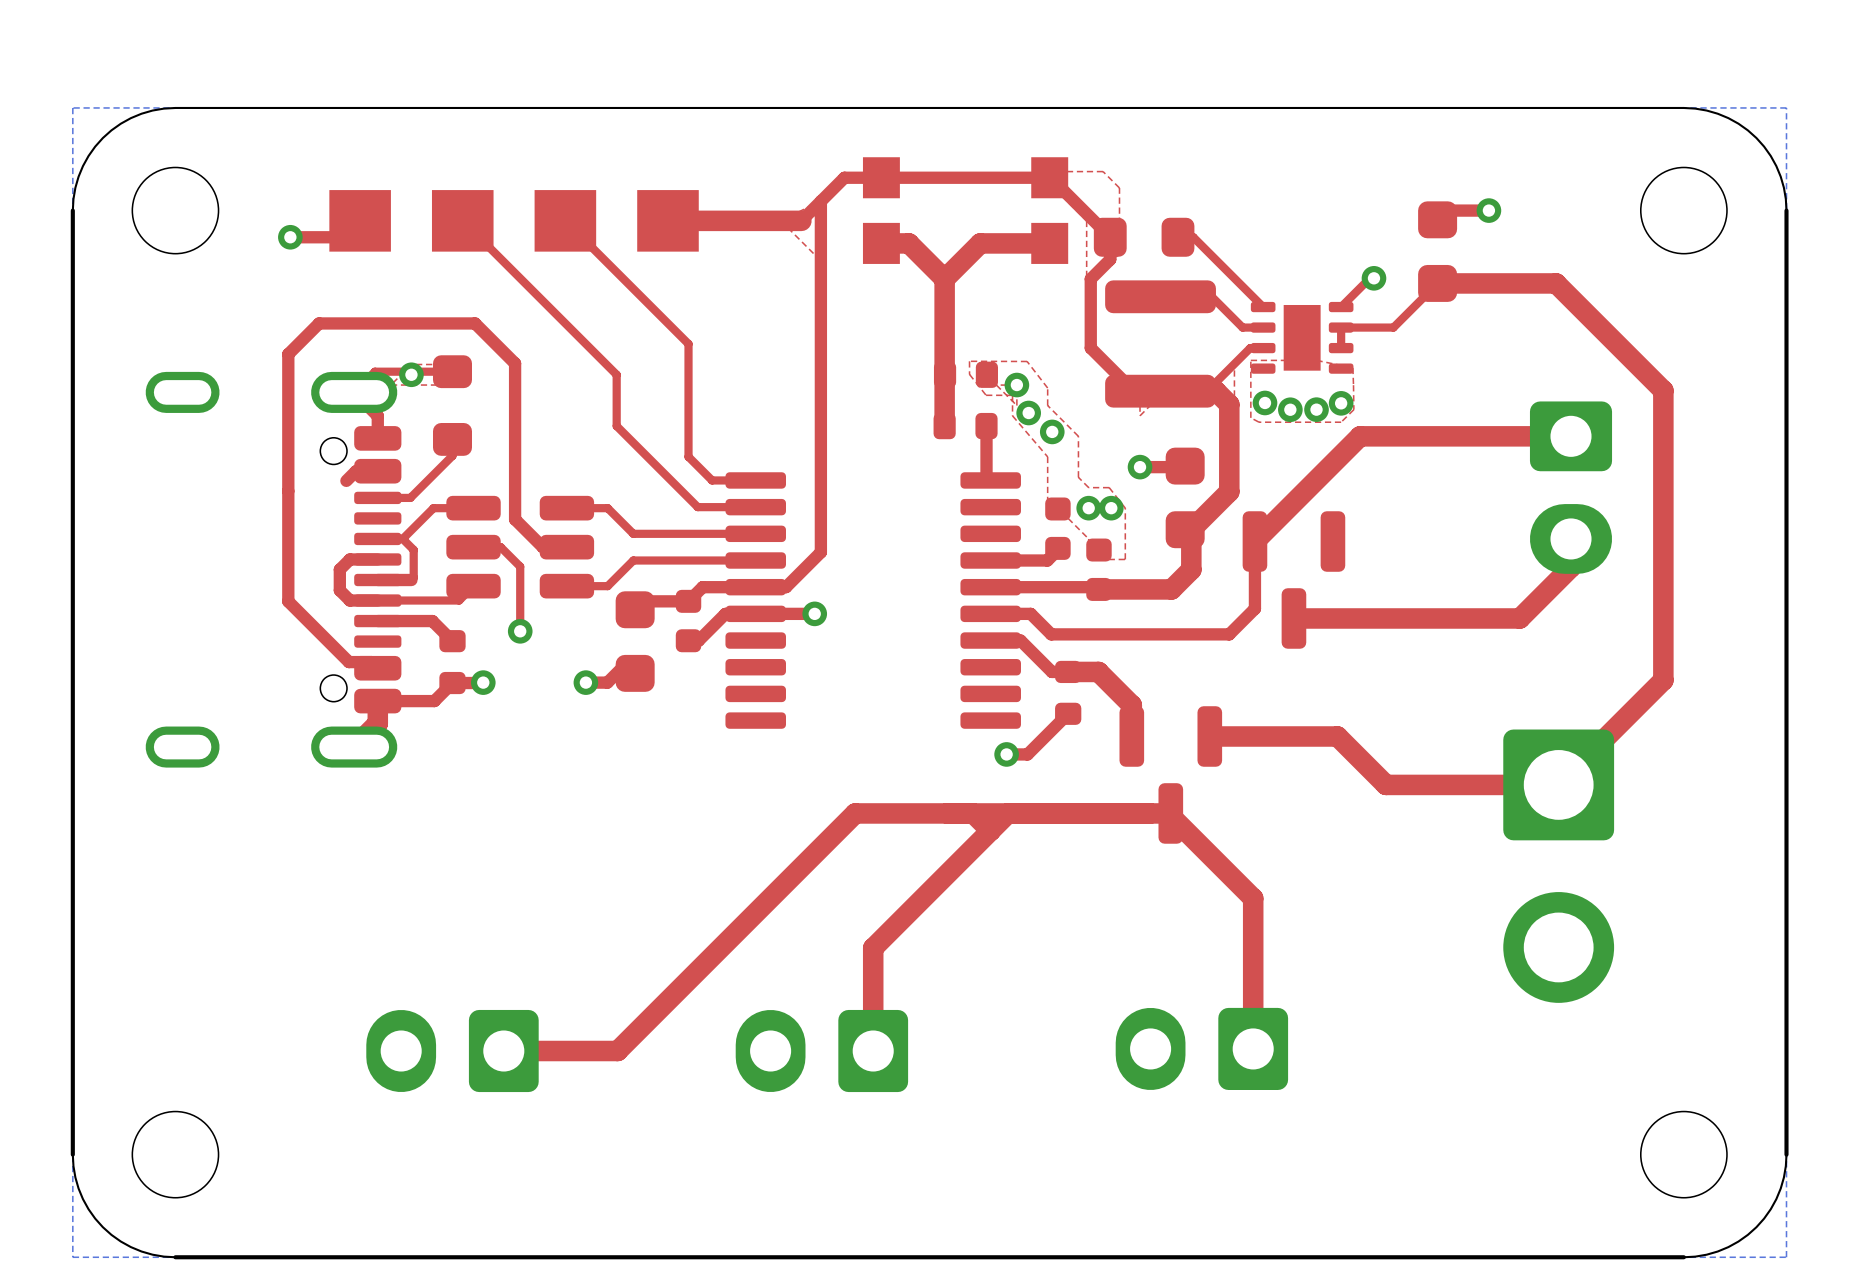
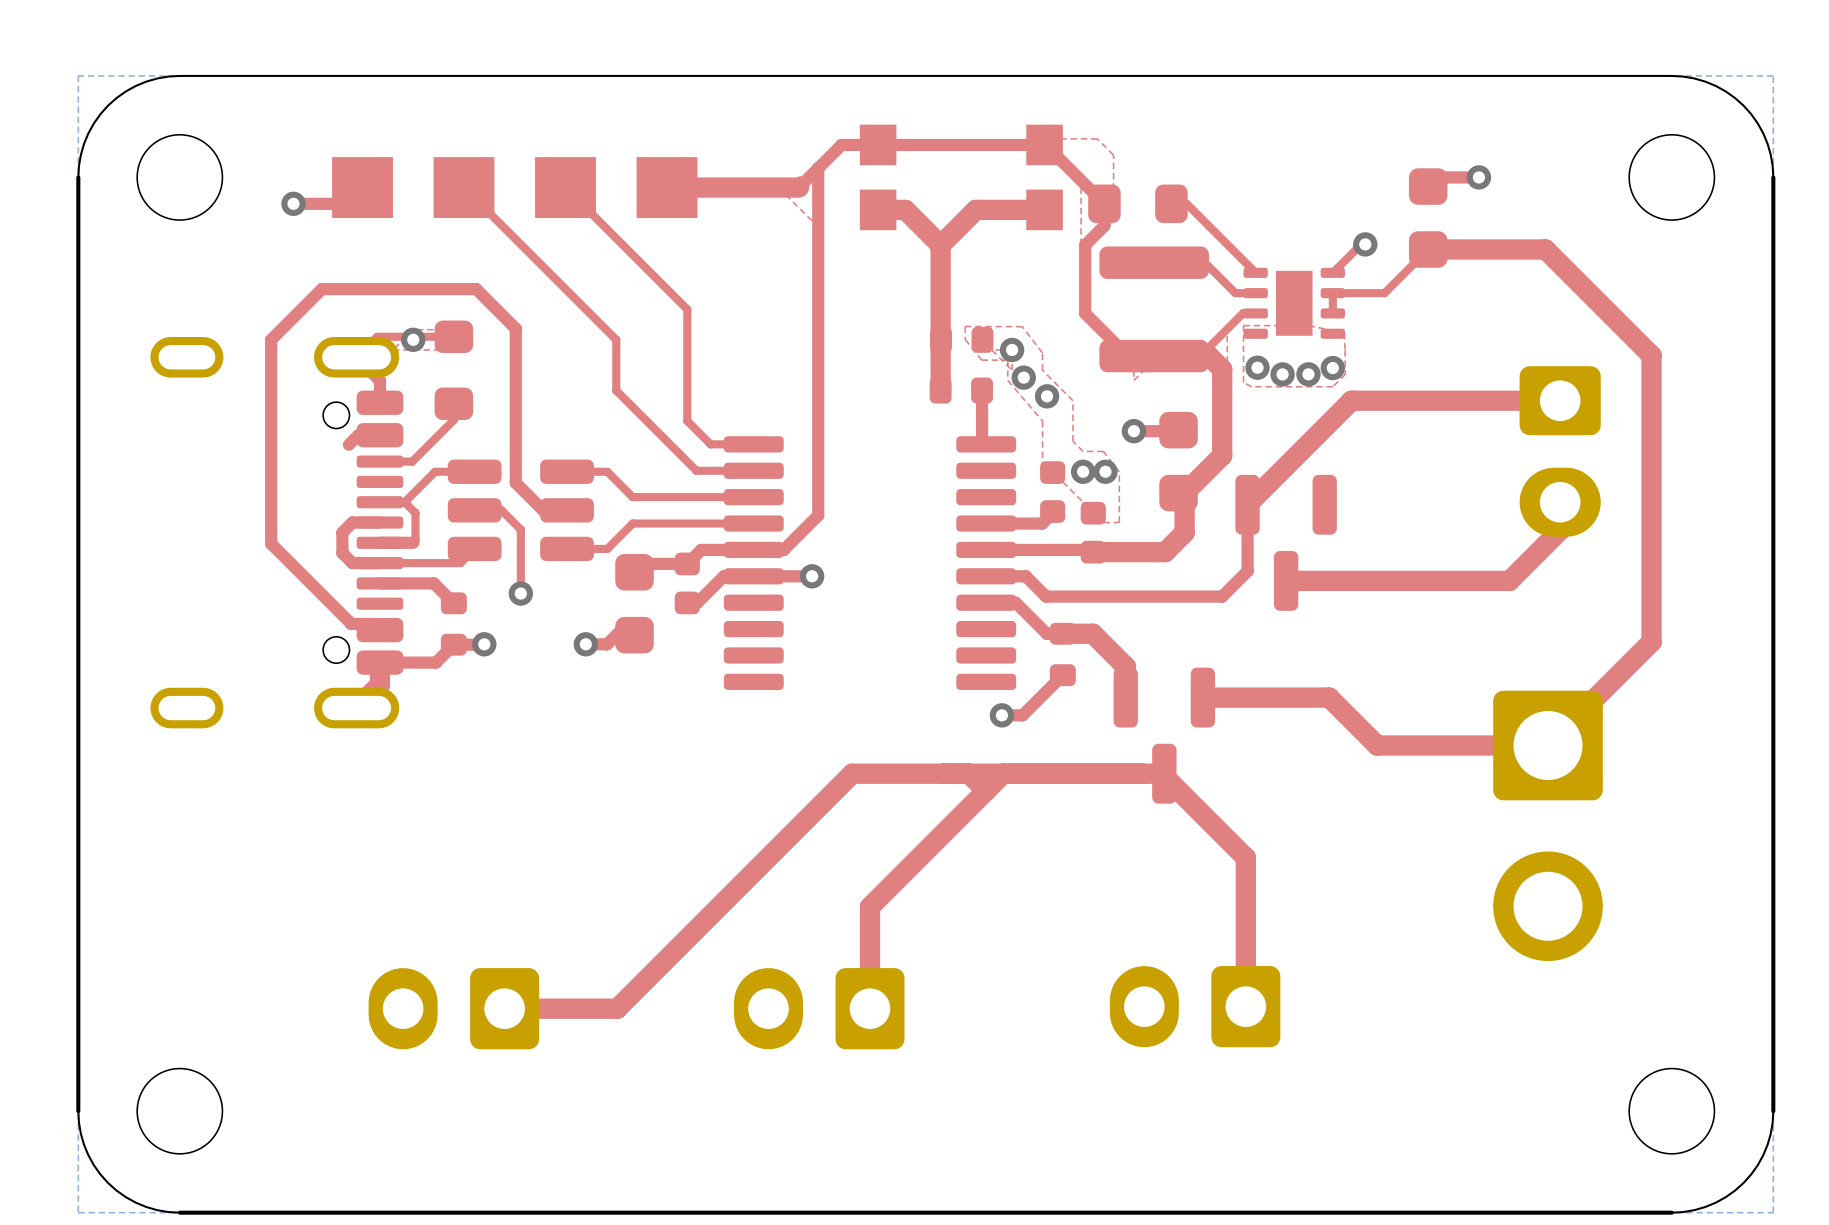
top track: (288, 354) (288, 601) -> (291, 319) (271, 339) (271, 543) (291, 564)

